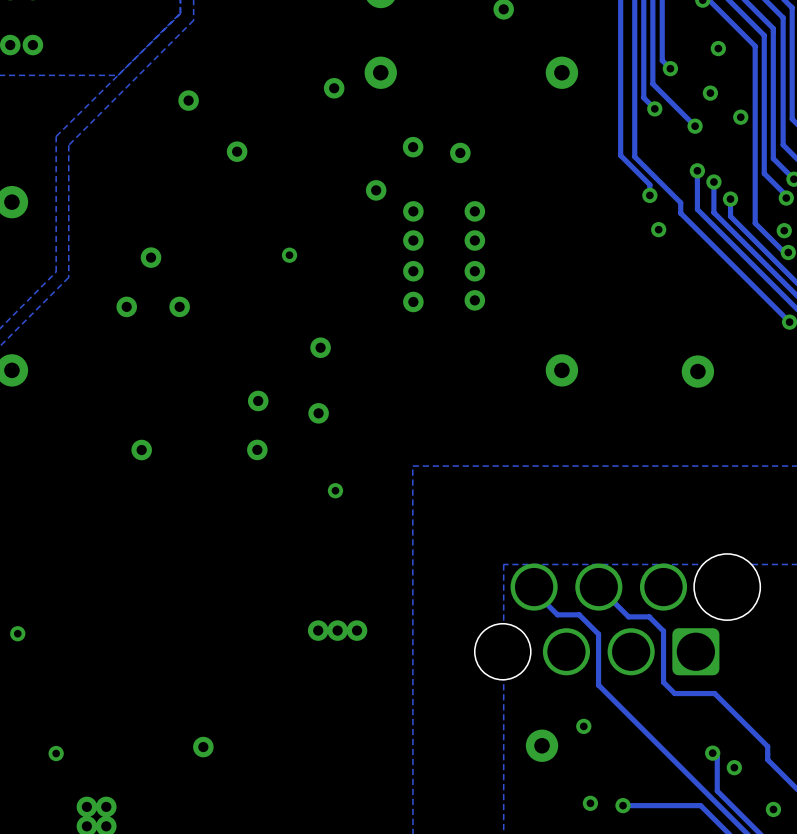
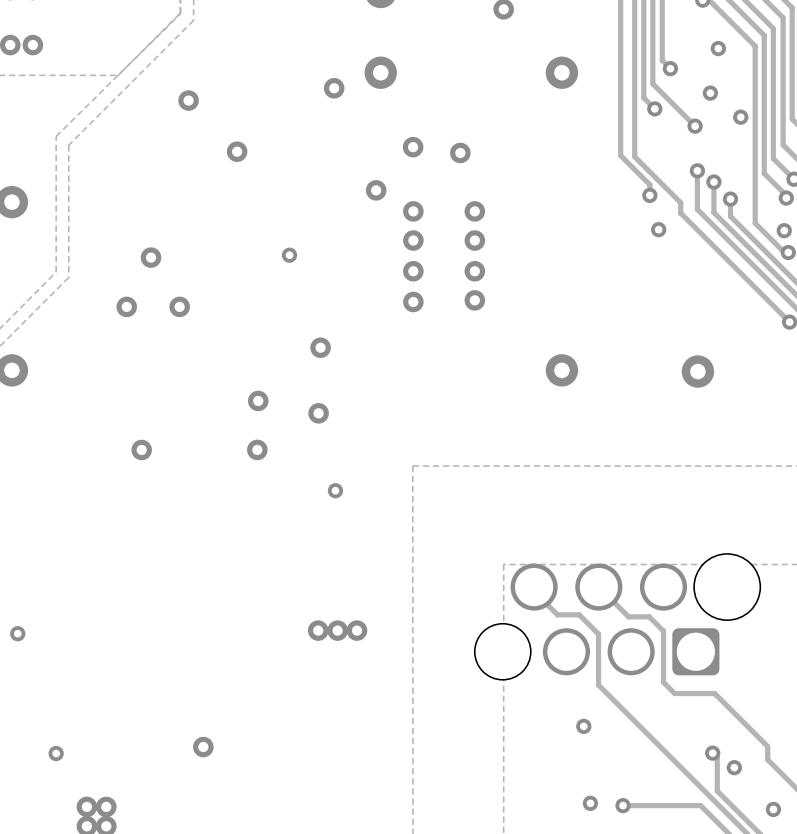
part: (542, 745) -> none

